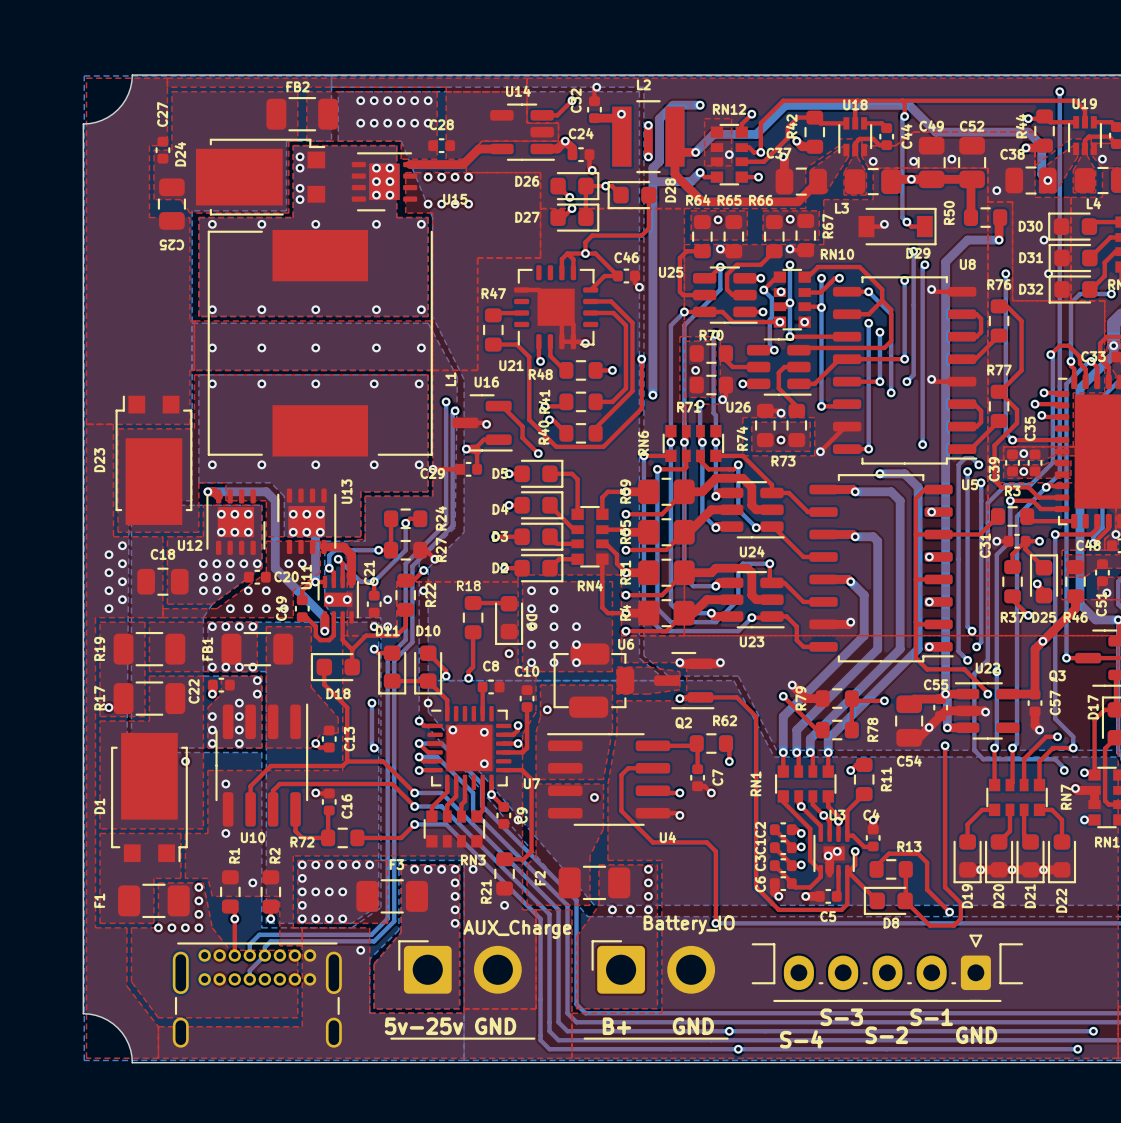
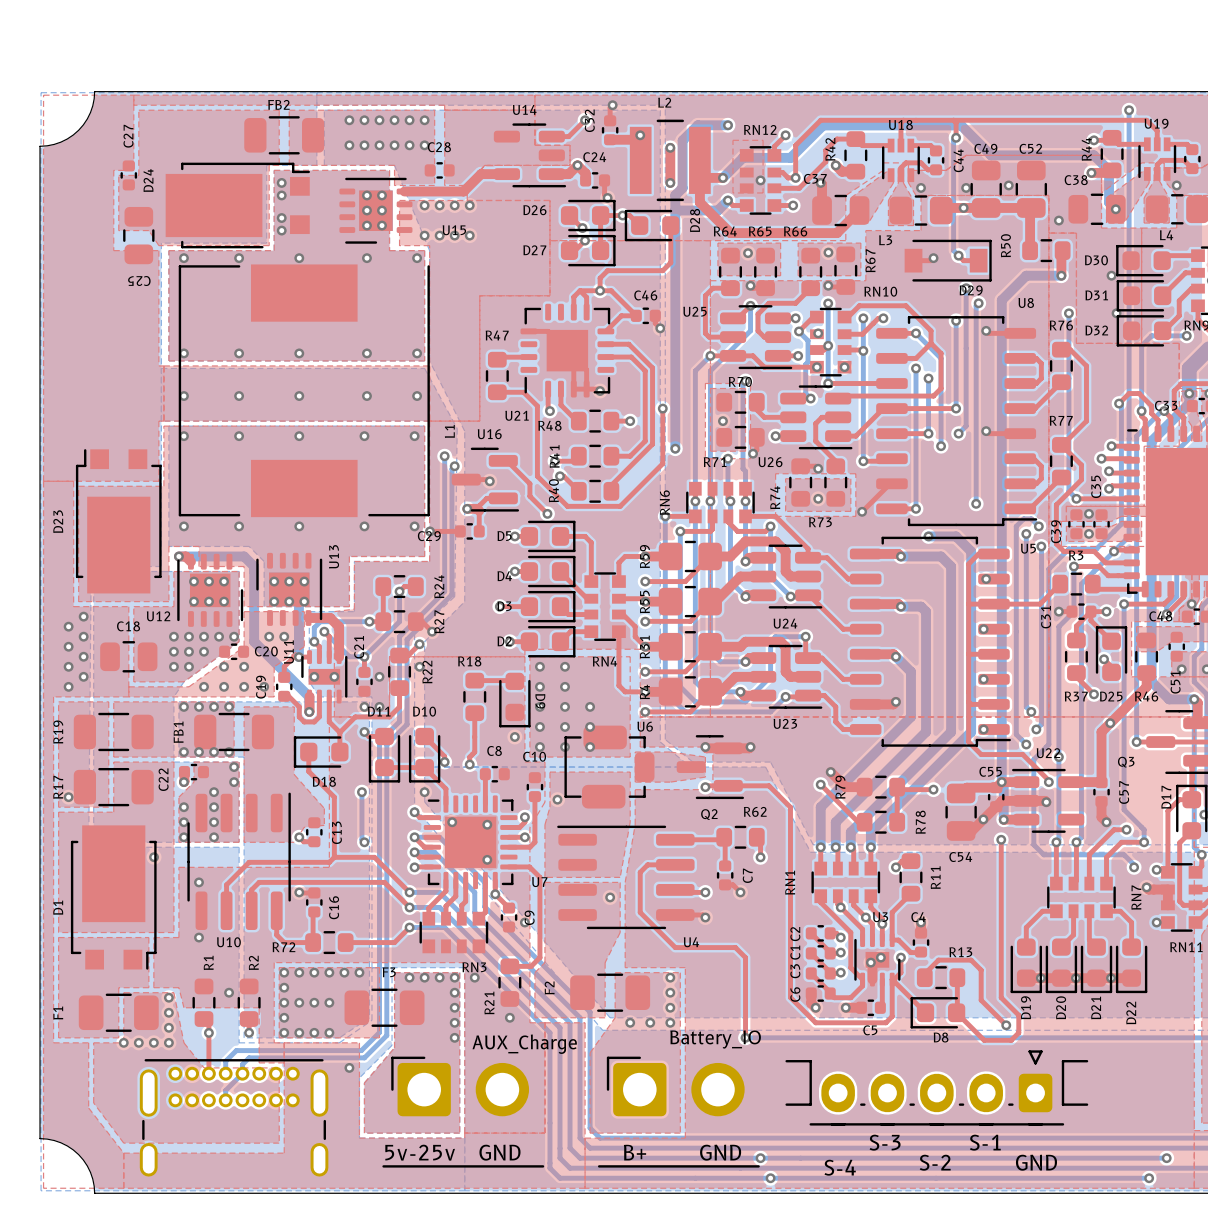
top track: none -> (1131, 485) (1111, 485) (1109, 488)
via: none -> (1109, 488)

